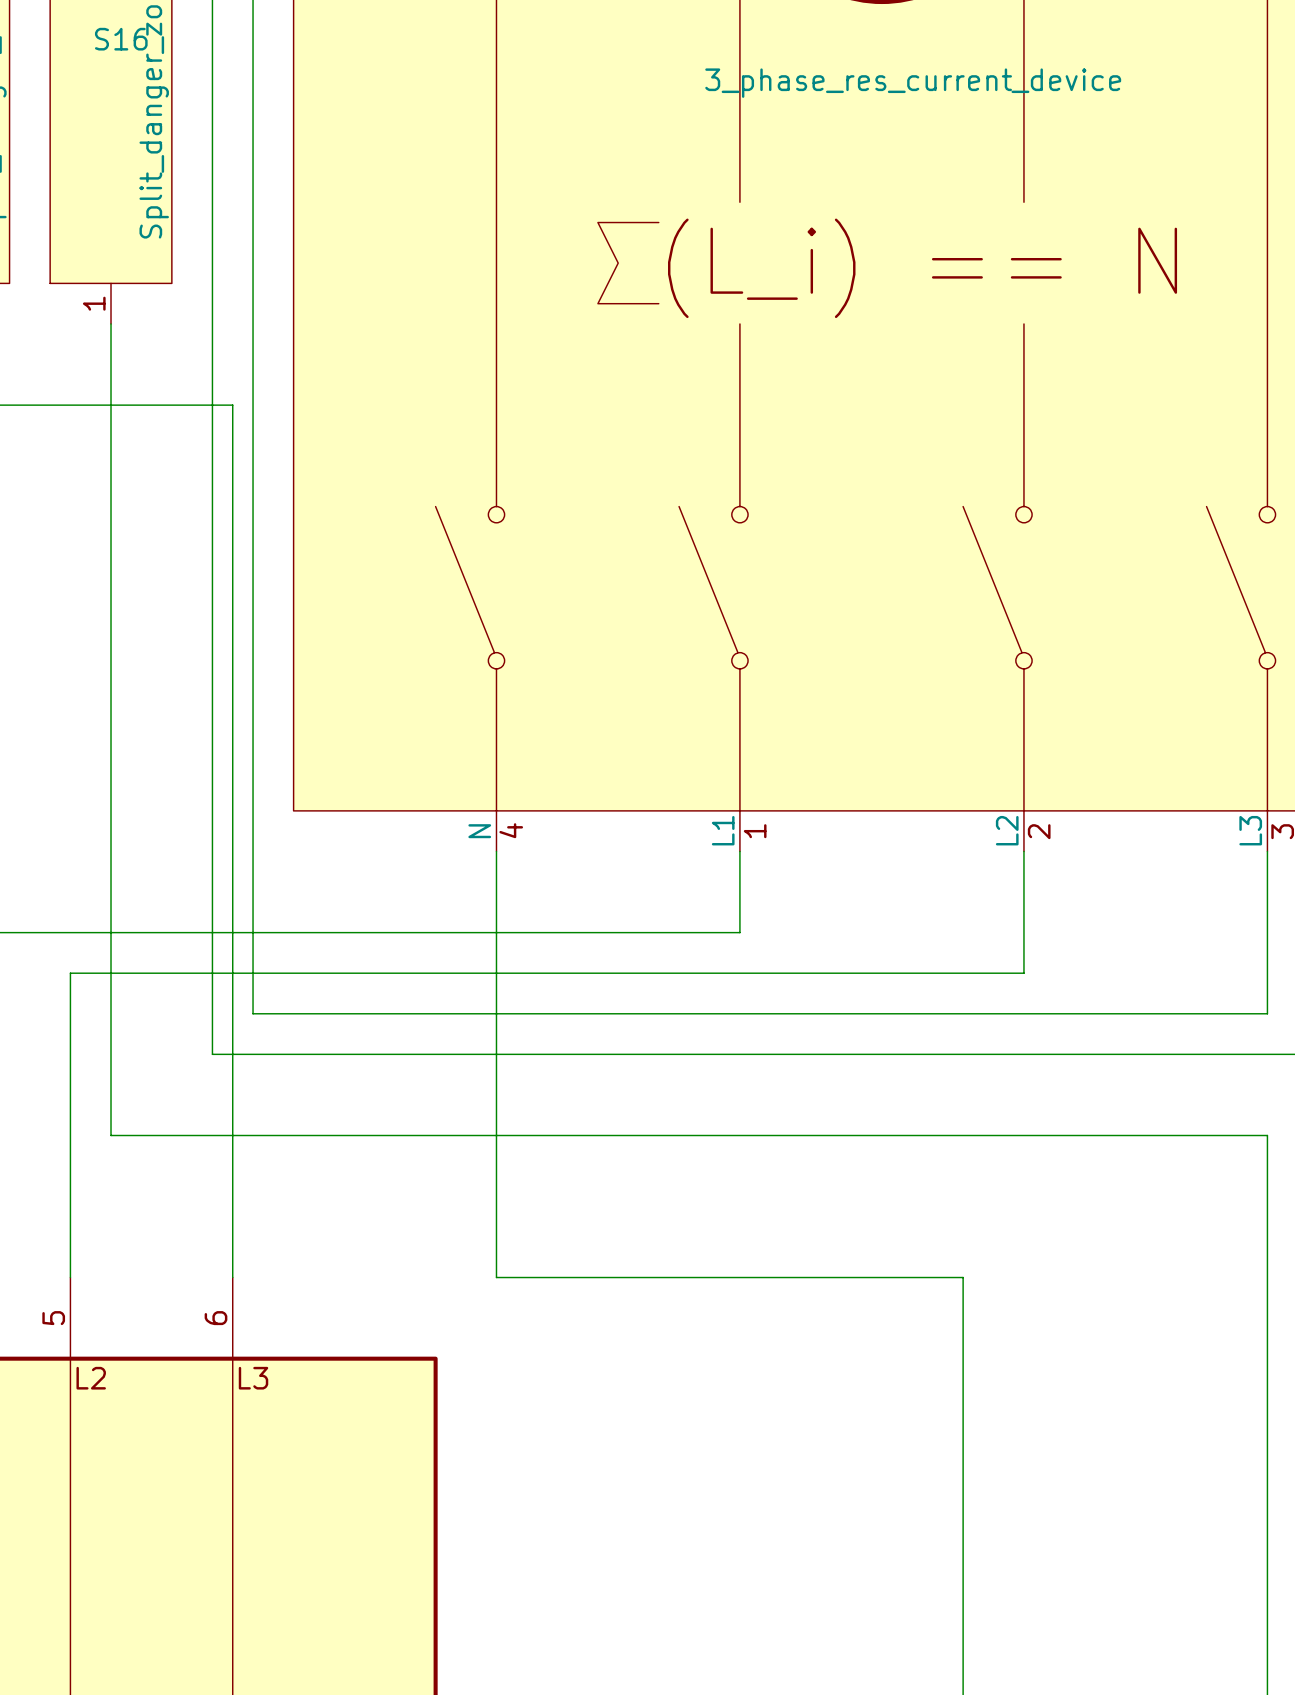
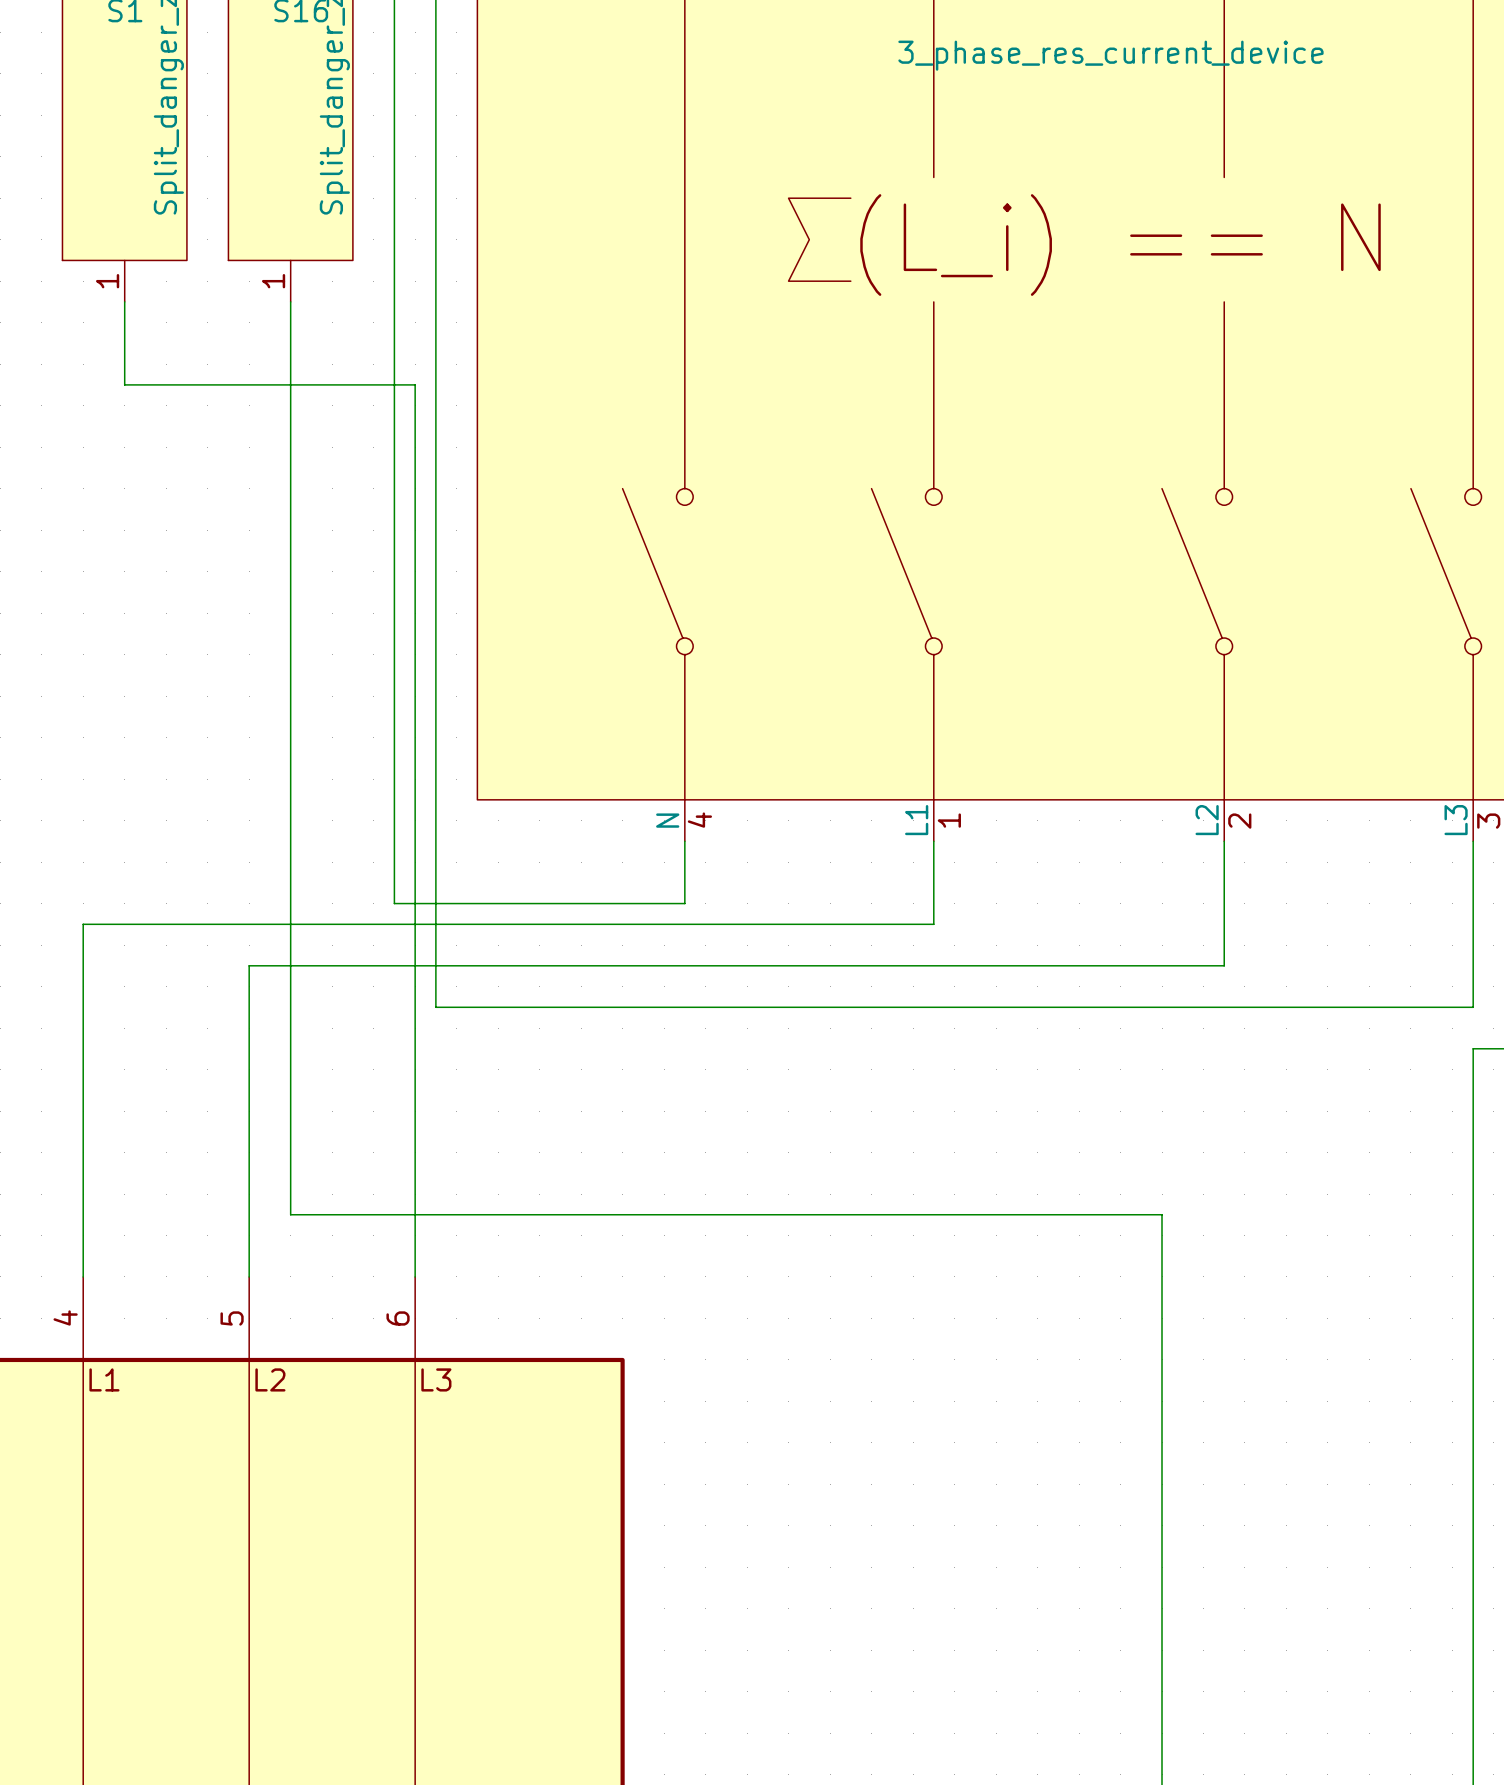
wire: (212, 912) (212, 1054) (1267, 1054) -> (394, 903) (684, 903)
wire: (496, 912) (496, 1277) (963, 1277) -> none
wire: none -> (1473, 1048) (1473, 1131)
wire: (111, 1135) (1267, 1135) -> (290, 1131) (290, 1214) (1162, 1214) (1162, 1276)

